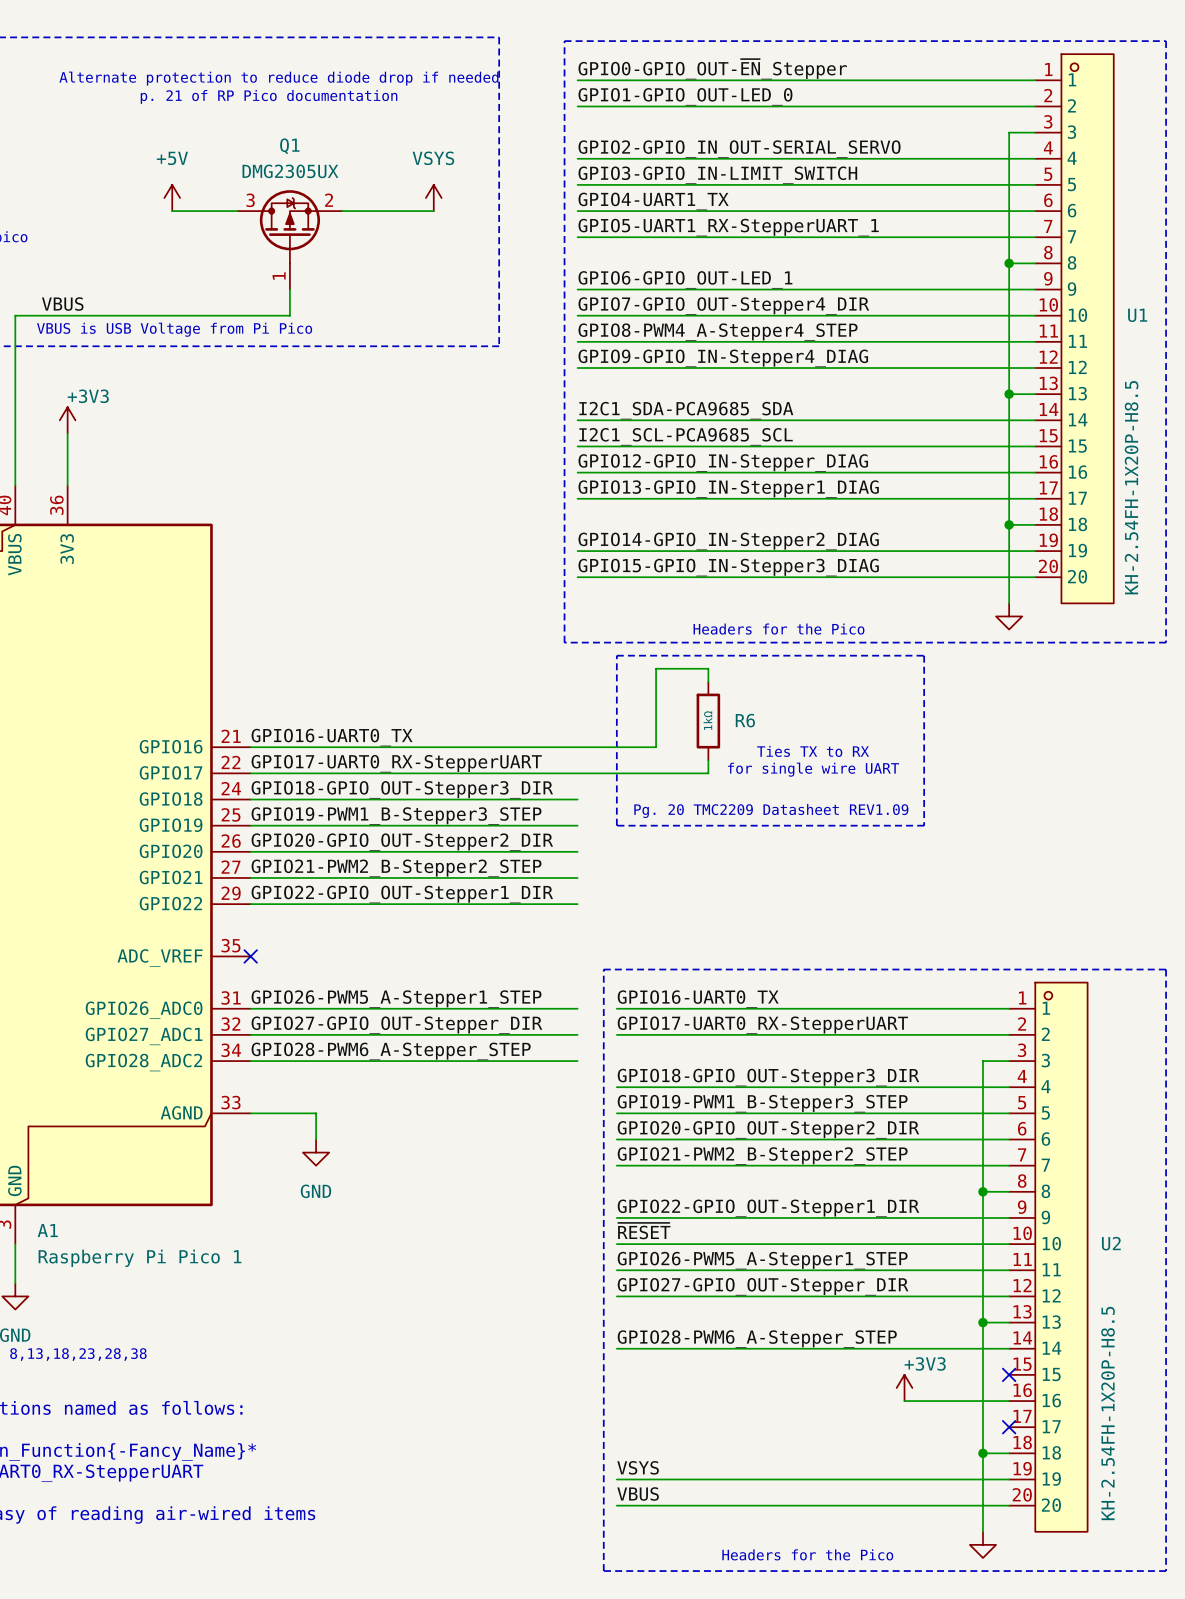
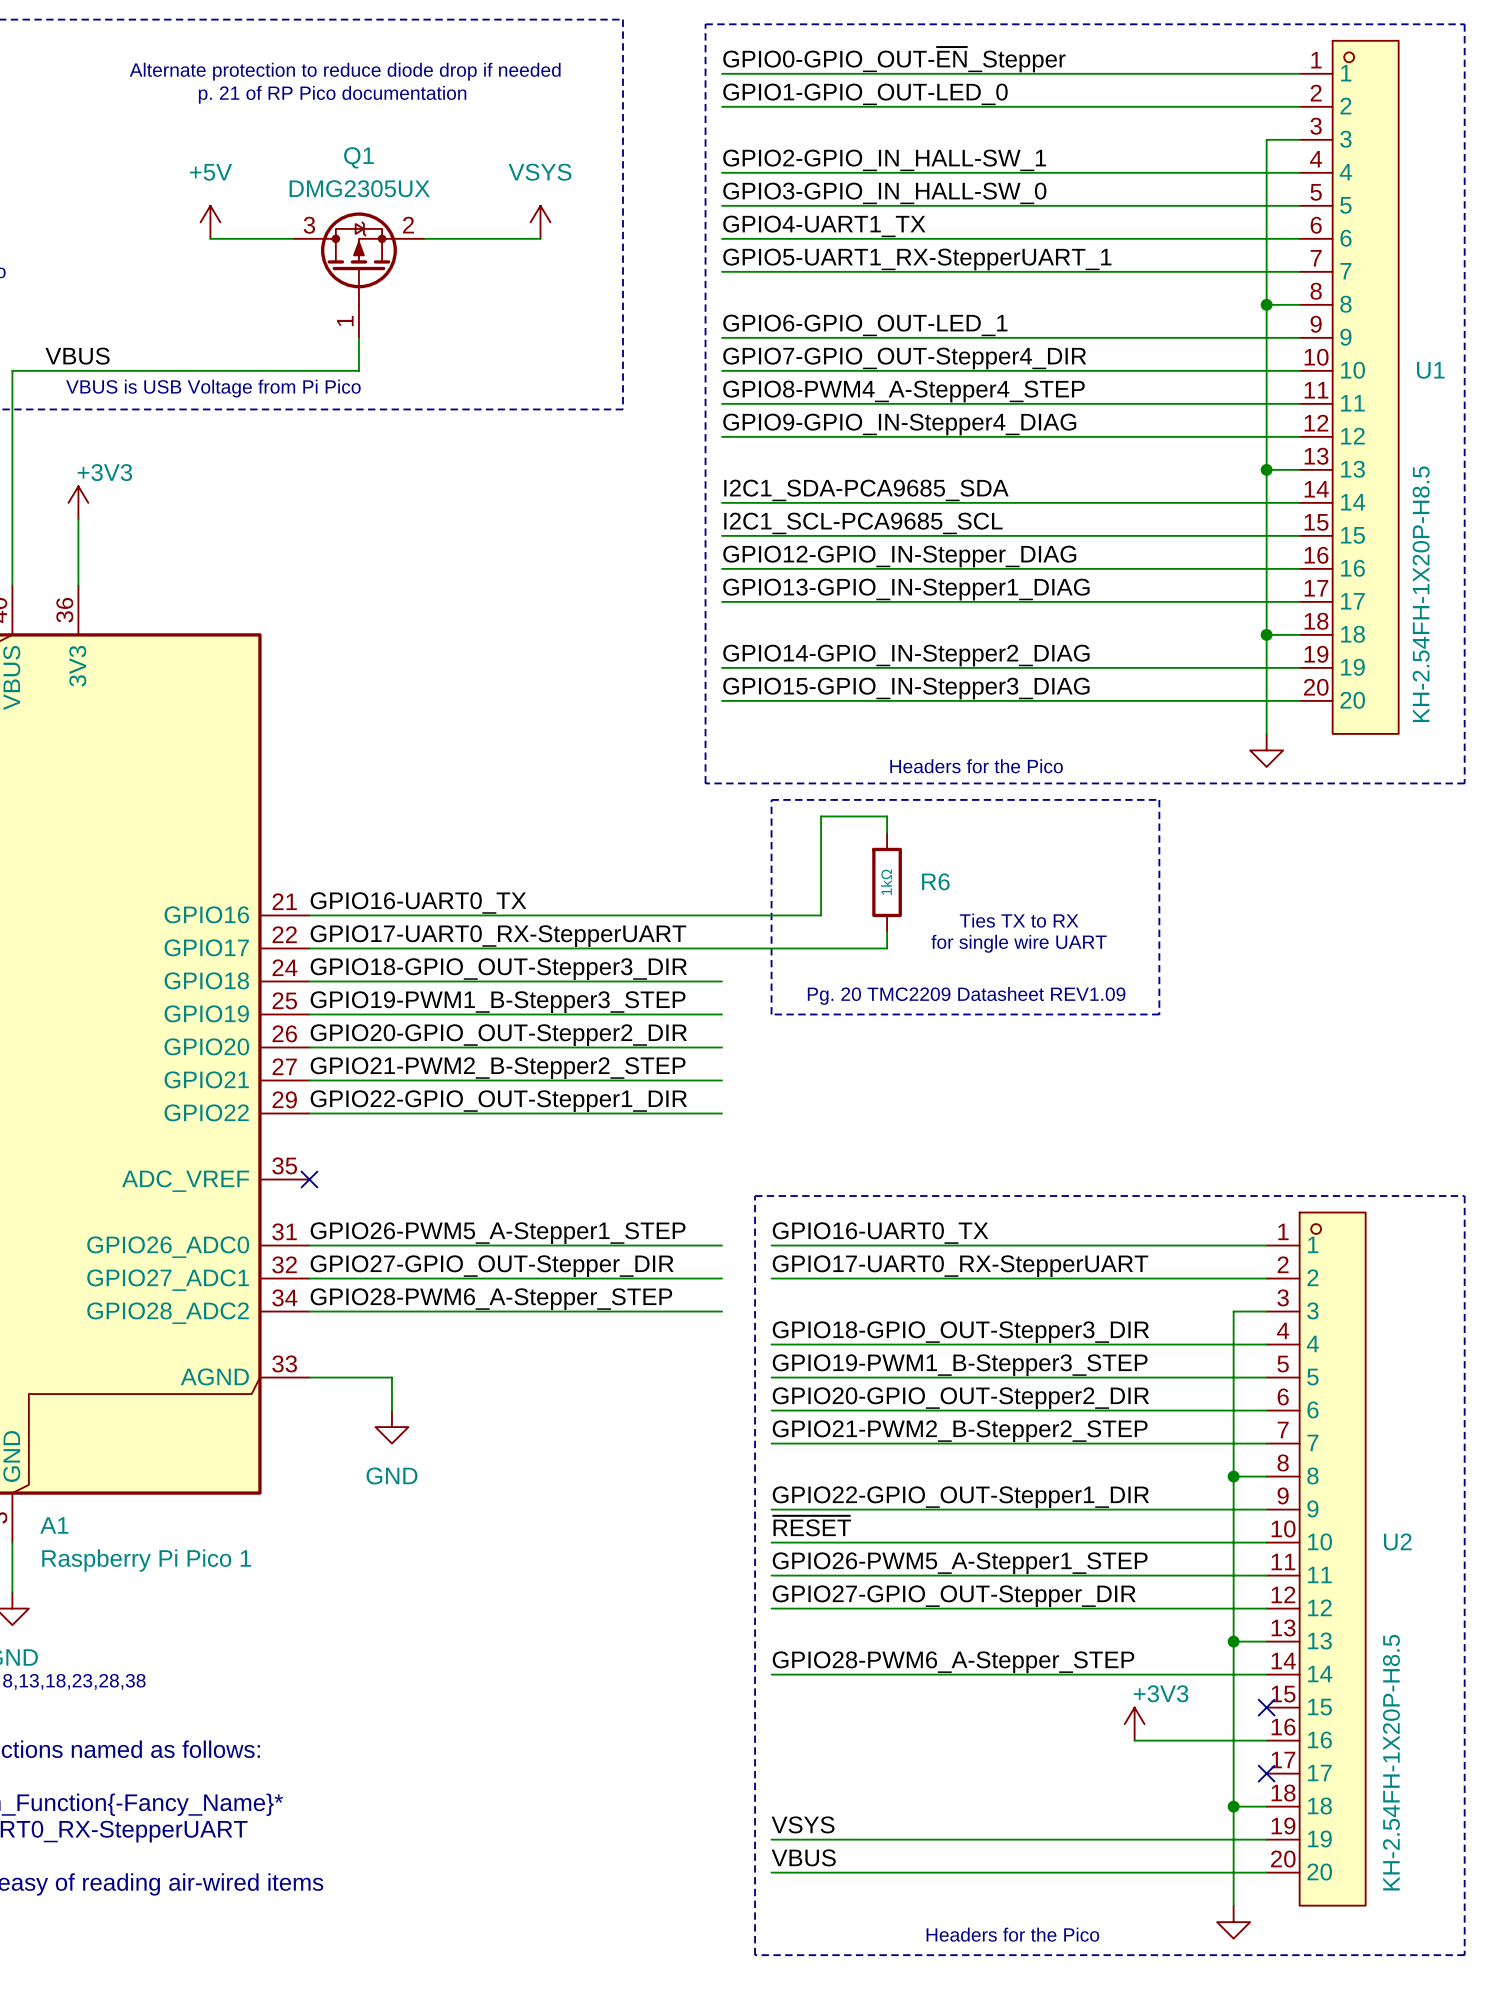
label: GPIO2-GPIO_IN_OUT-SERIAL_SERVO (739, 149) -> GPIO2-GPIO_IN_HALL-SW_1 (884, 160)
label: GPIO3-GPIO_IN-LIMIT_SWITCH (717, 175) -> GPIO3-GPIO_IN_HALL-SW_0 (884, 193)

